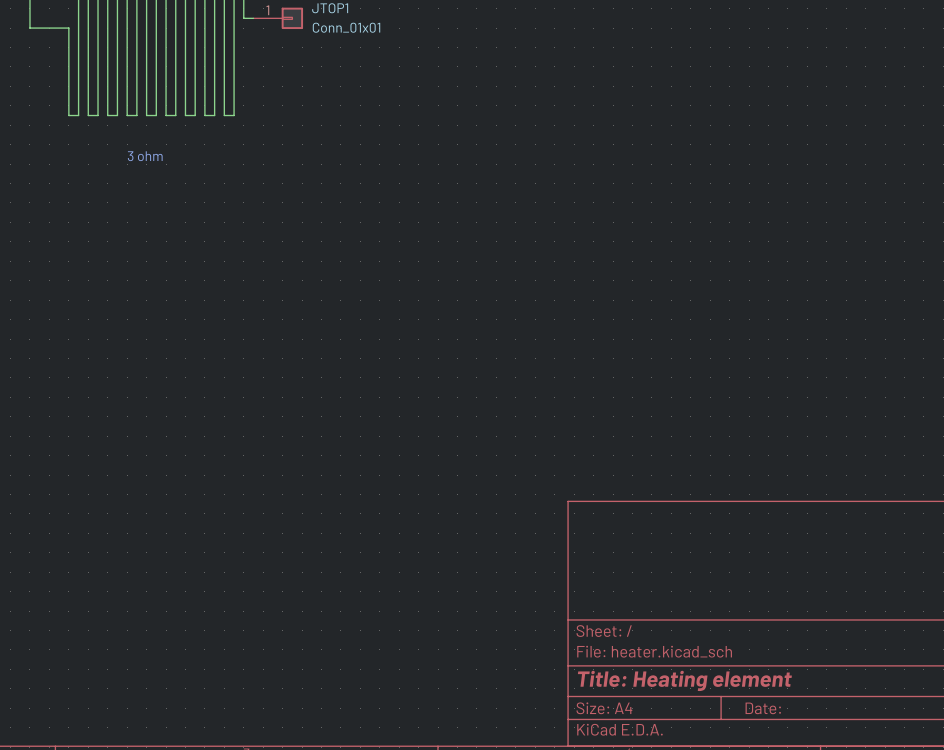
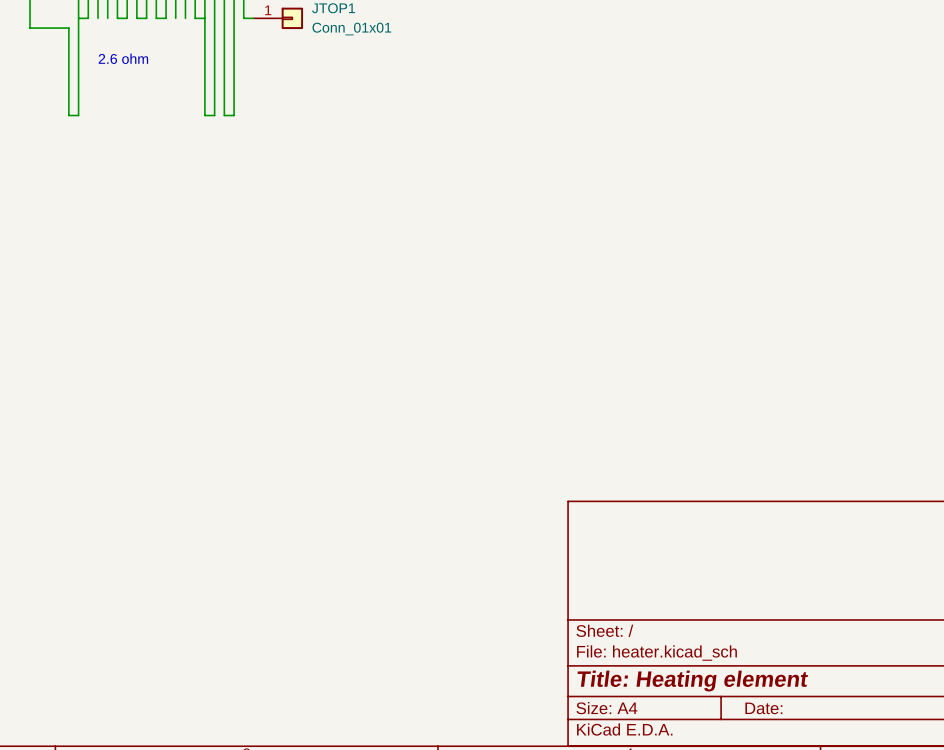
wire: (88, 18) (88, 115) (98, 115) (98, 18) -> (88, 18) (78, 18)
wire: (107, 18) (107, 115) (117, 115) (117, 18) -> (127, 18) (117, 18)
wire: (127, 18) (127, 115) (136, 115) (136, 18) -> none
wire: (146, 18) (146, 115) (156, 115) (156, 18) -> (146, 18) (136, 18)
wire: (166, 18) (166, 115) (175, 115) (175, 18) -> (166, 18) (156, 18)
wire: (185, 18) (185, 115) (195, 115) (195, 18) -> (204, 18) (195, 18)
text: none -> 2.6 ohm (123, 58)
text: 3 ohm (145, 156) -> none

